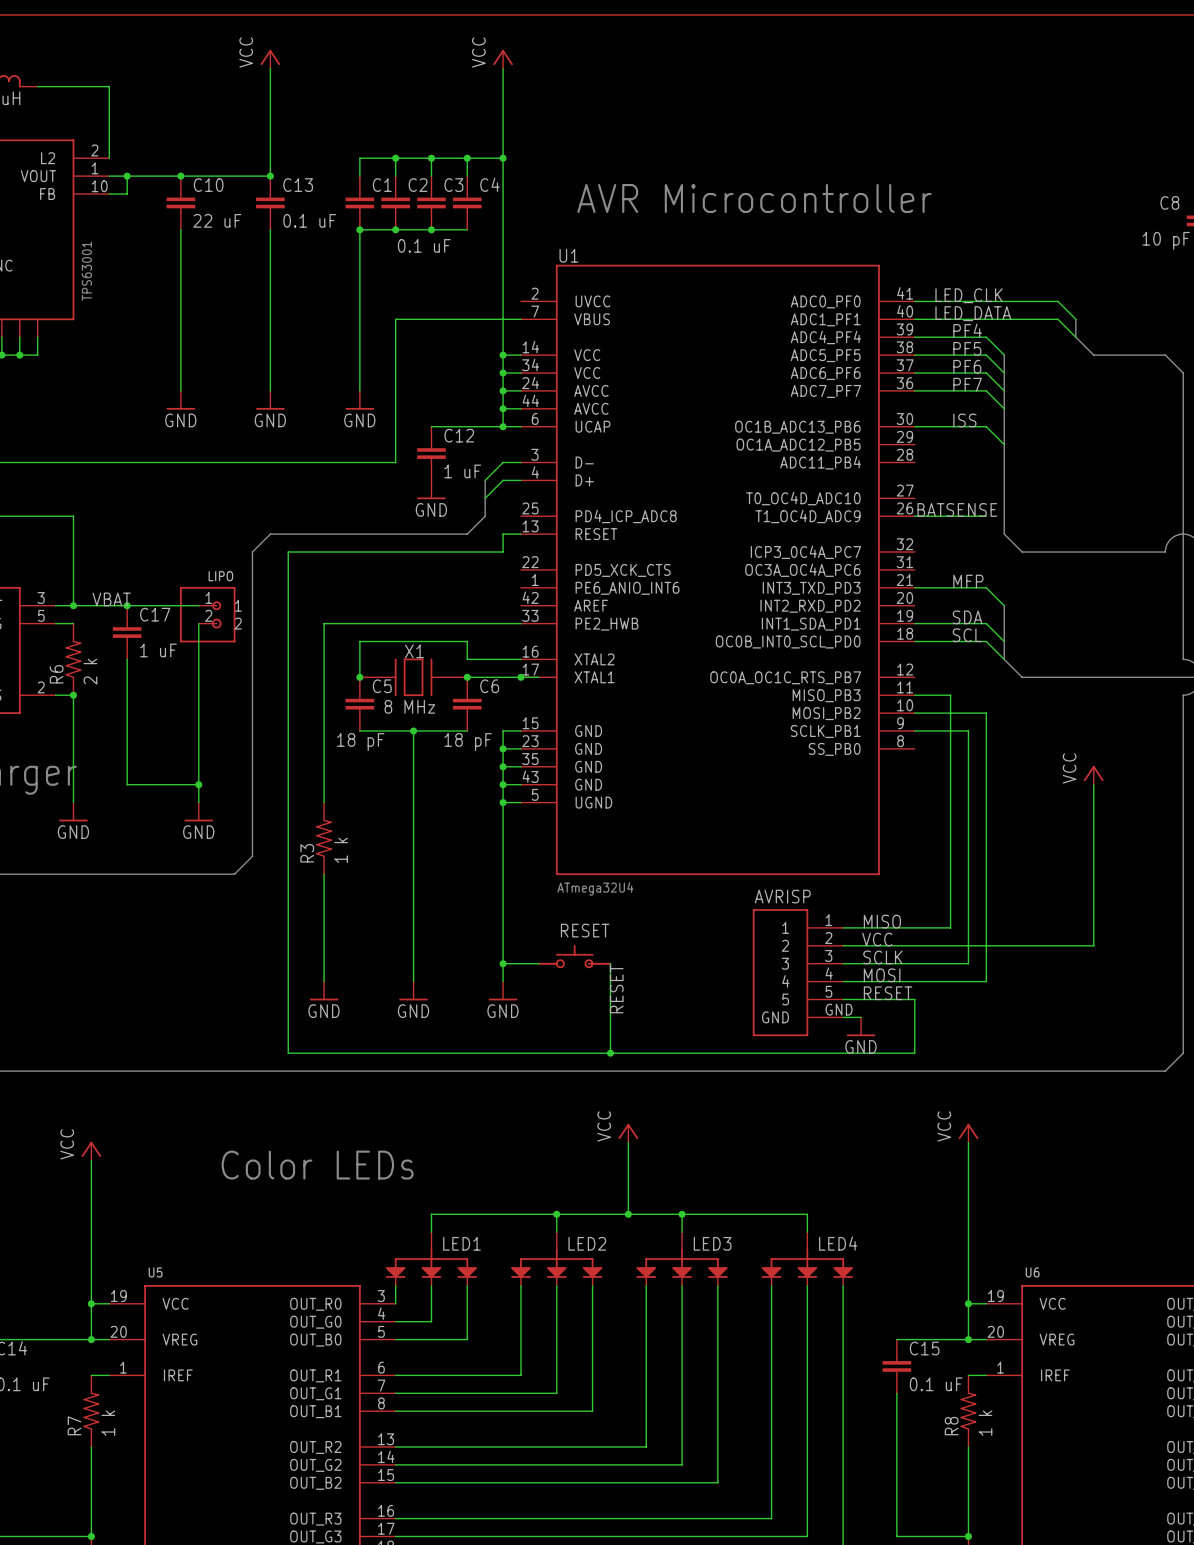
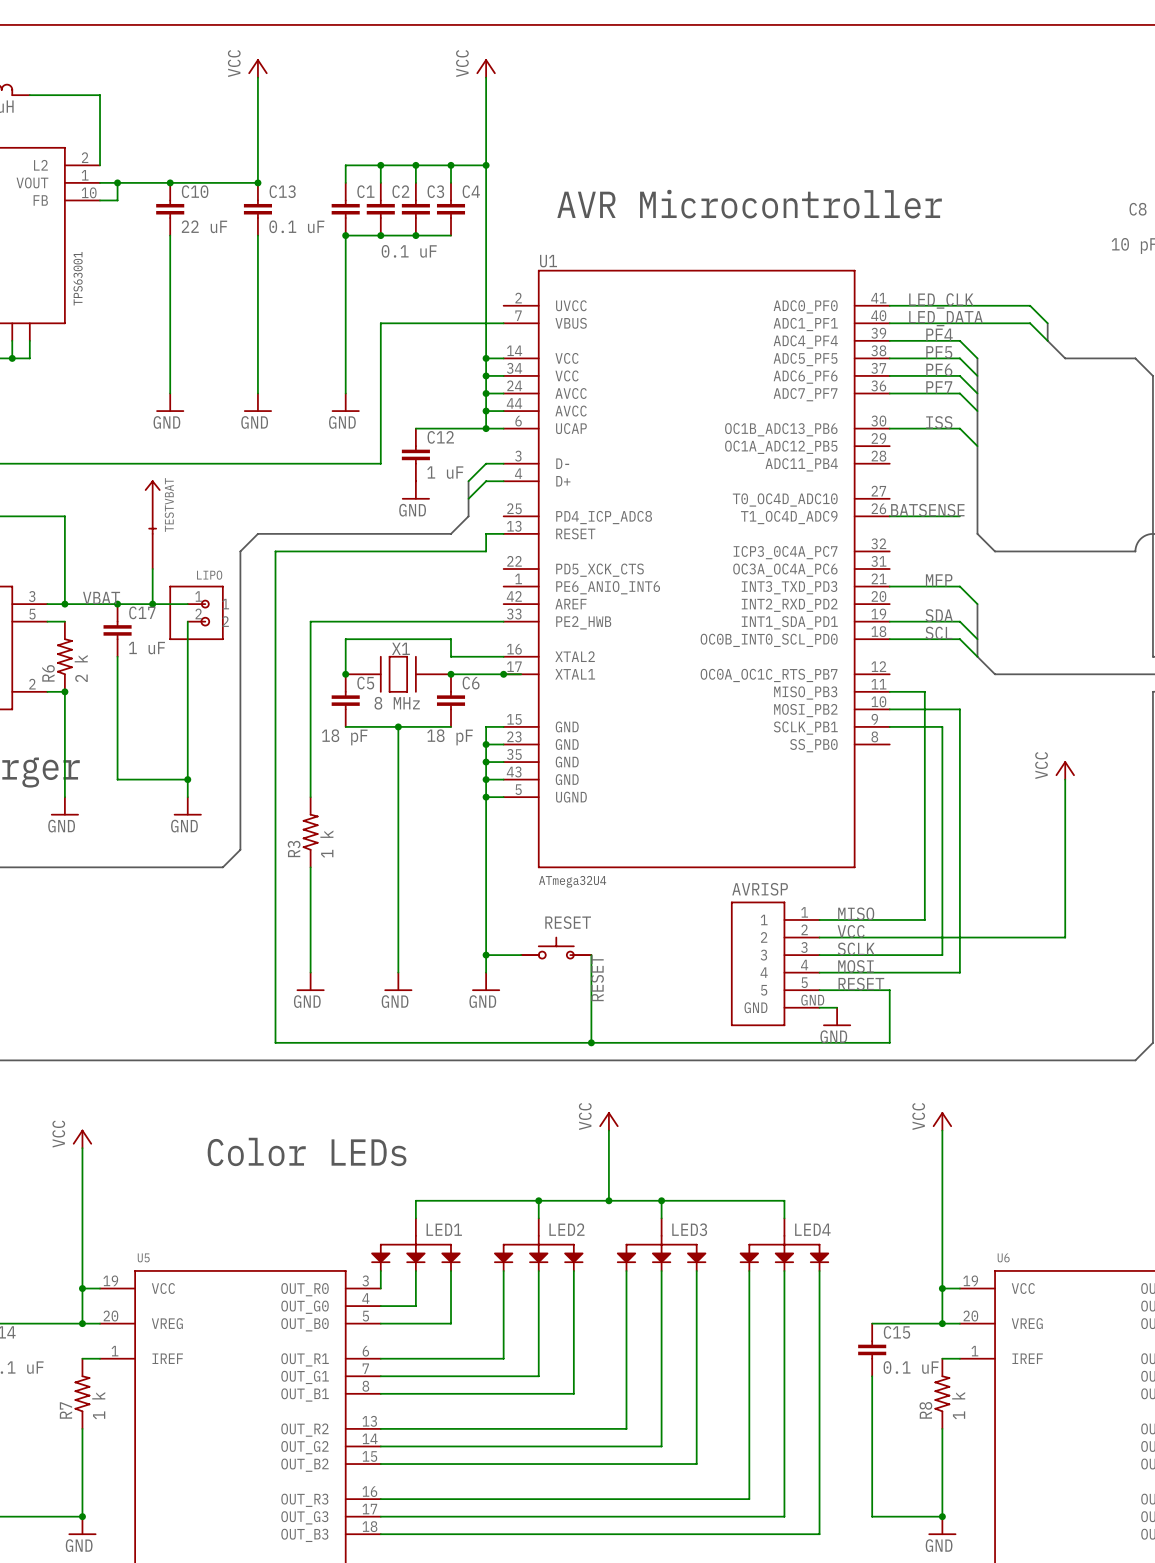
TESTVBAT: none -> (152, 524)
wire: none -> (152, 569) (152, 604)
junction: none -> (152, 604)

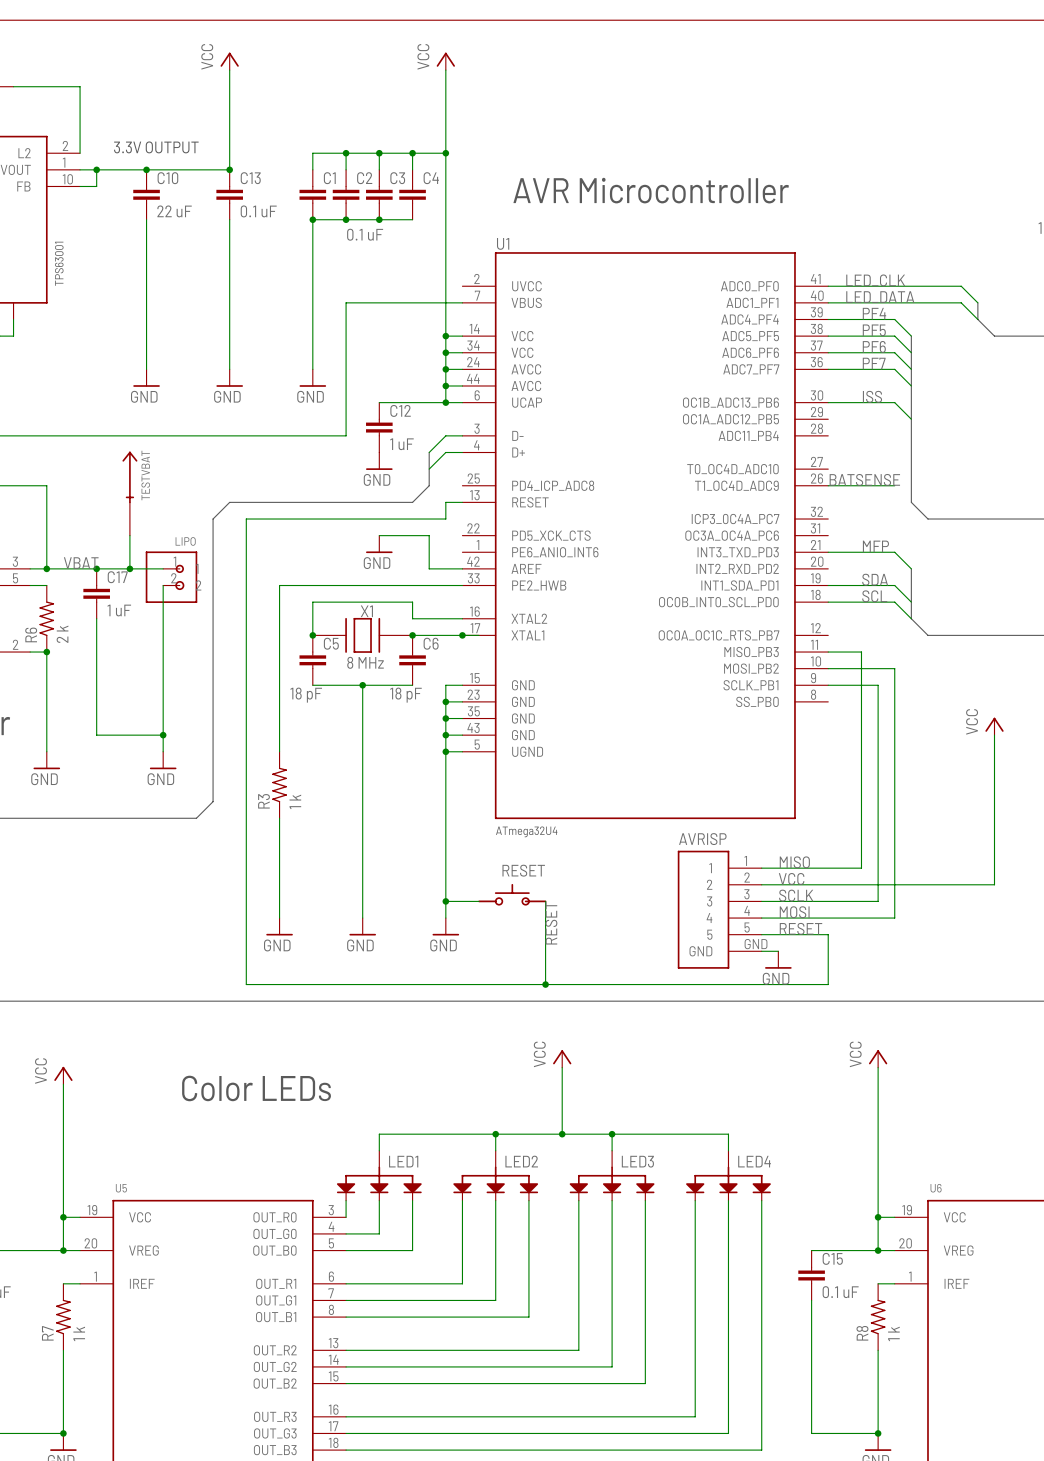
text: none -> 3.3V OUTPUT (156, 147)
wire: none -> (379, 535) (429, 535) (429, 568) (462, 568)
power symbol: none -> GND (379, 544)

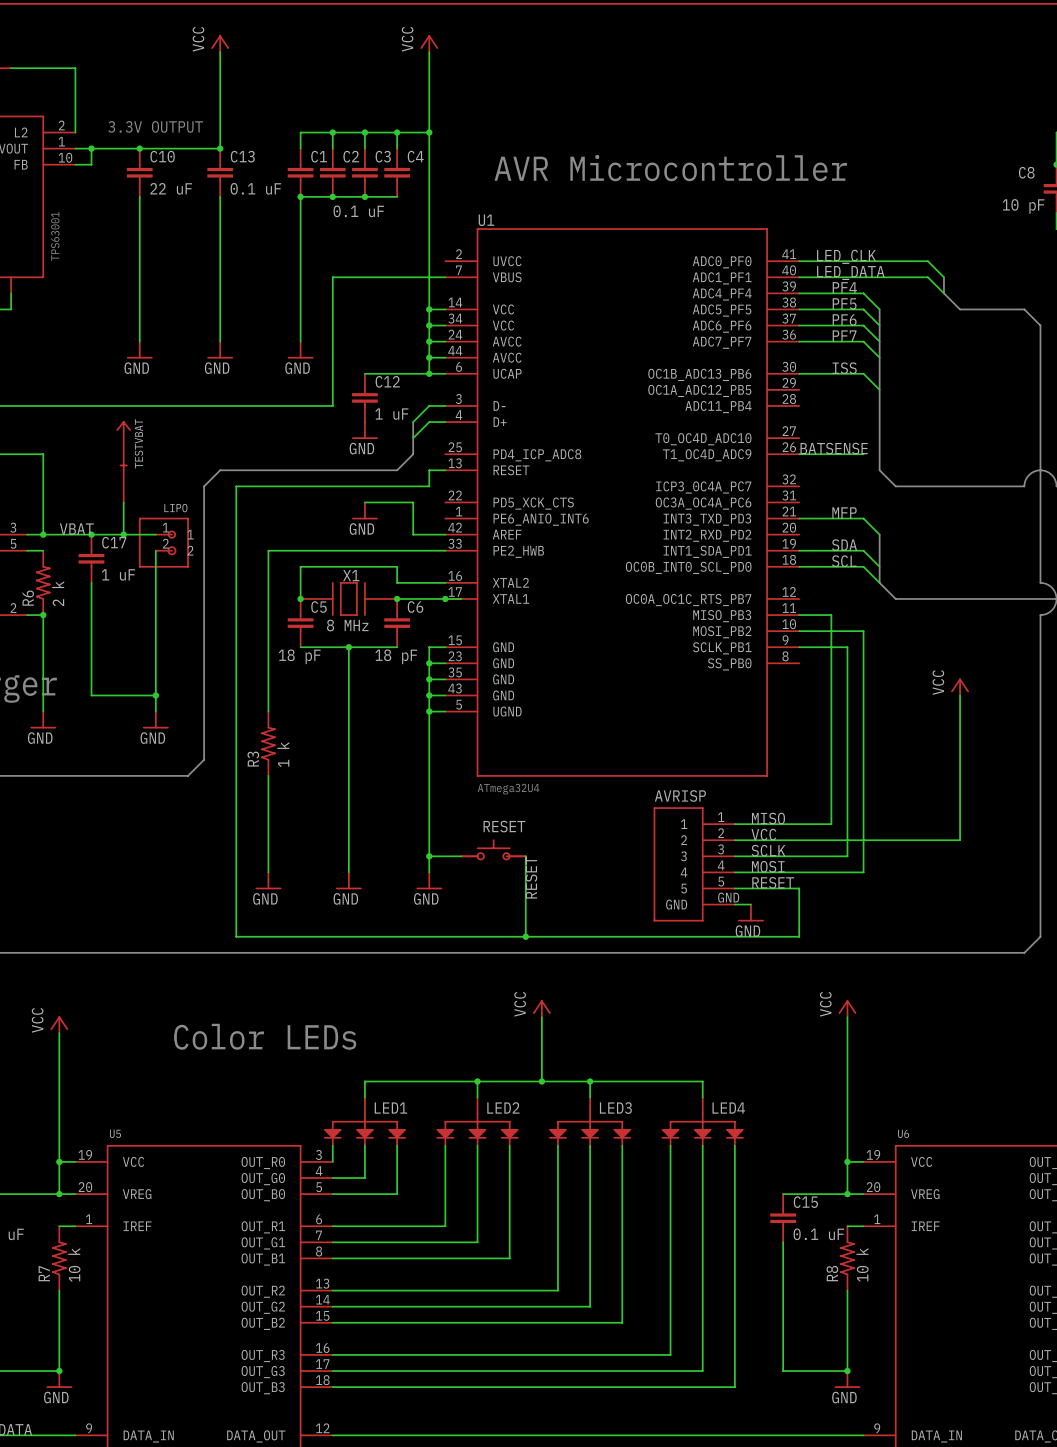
R7 value: 1 k (79, 1333) -> 10 k (74, 1264)
R8 value: 1 k (893, 1333) -> 10 k (862, 1264)

